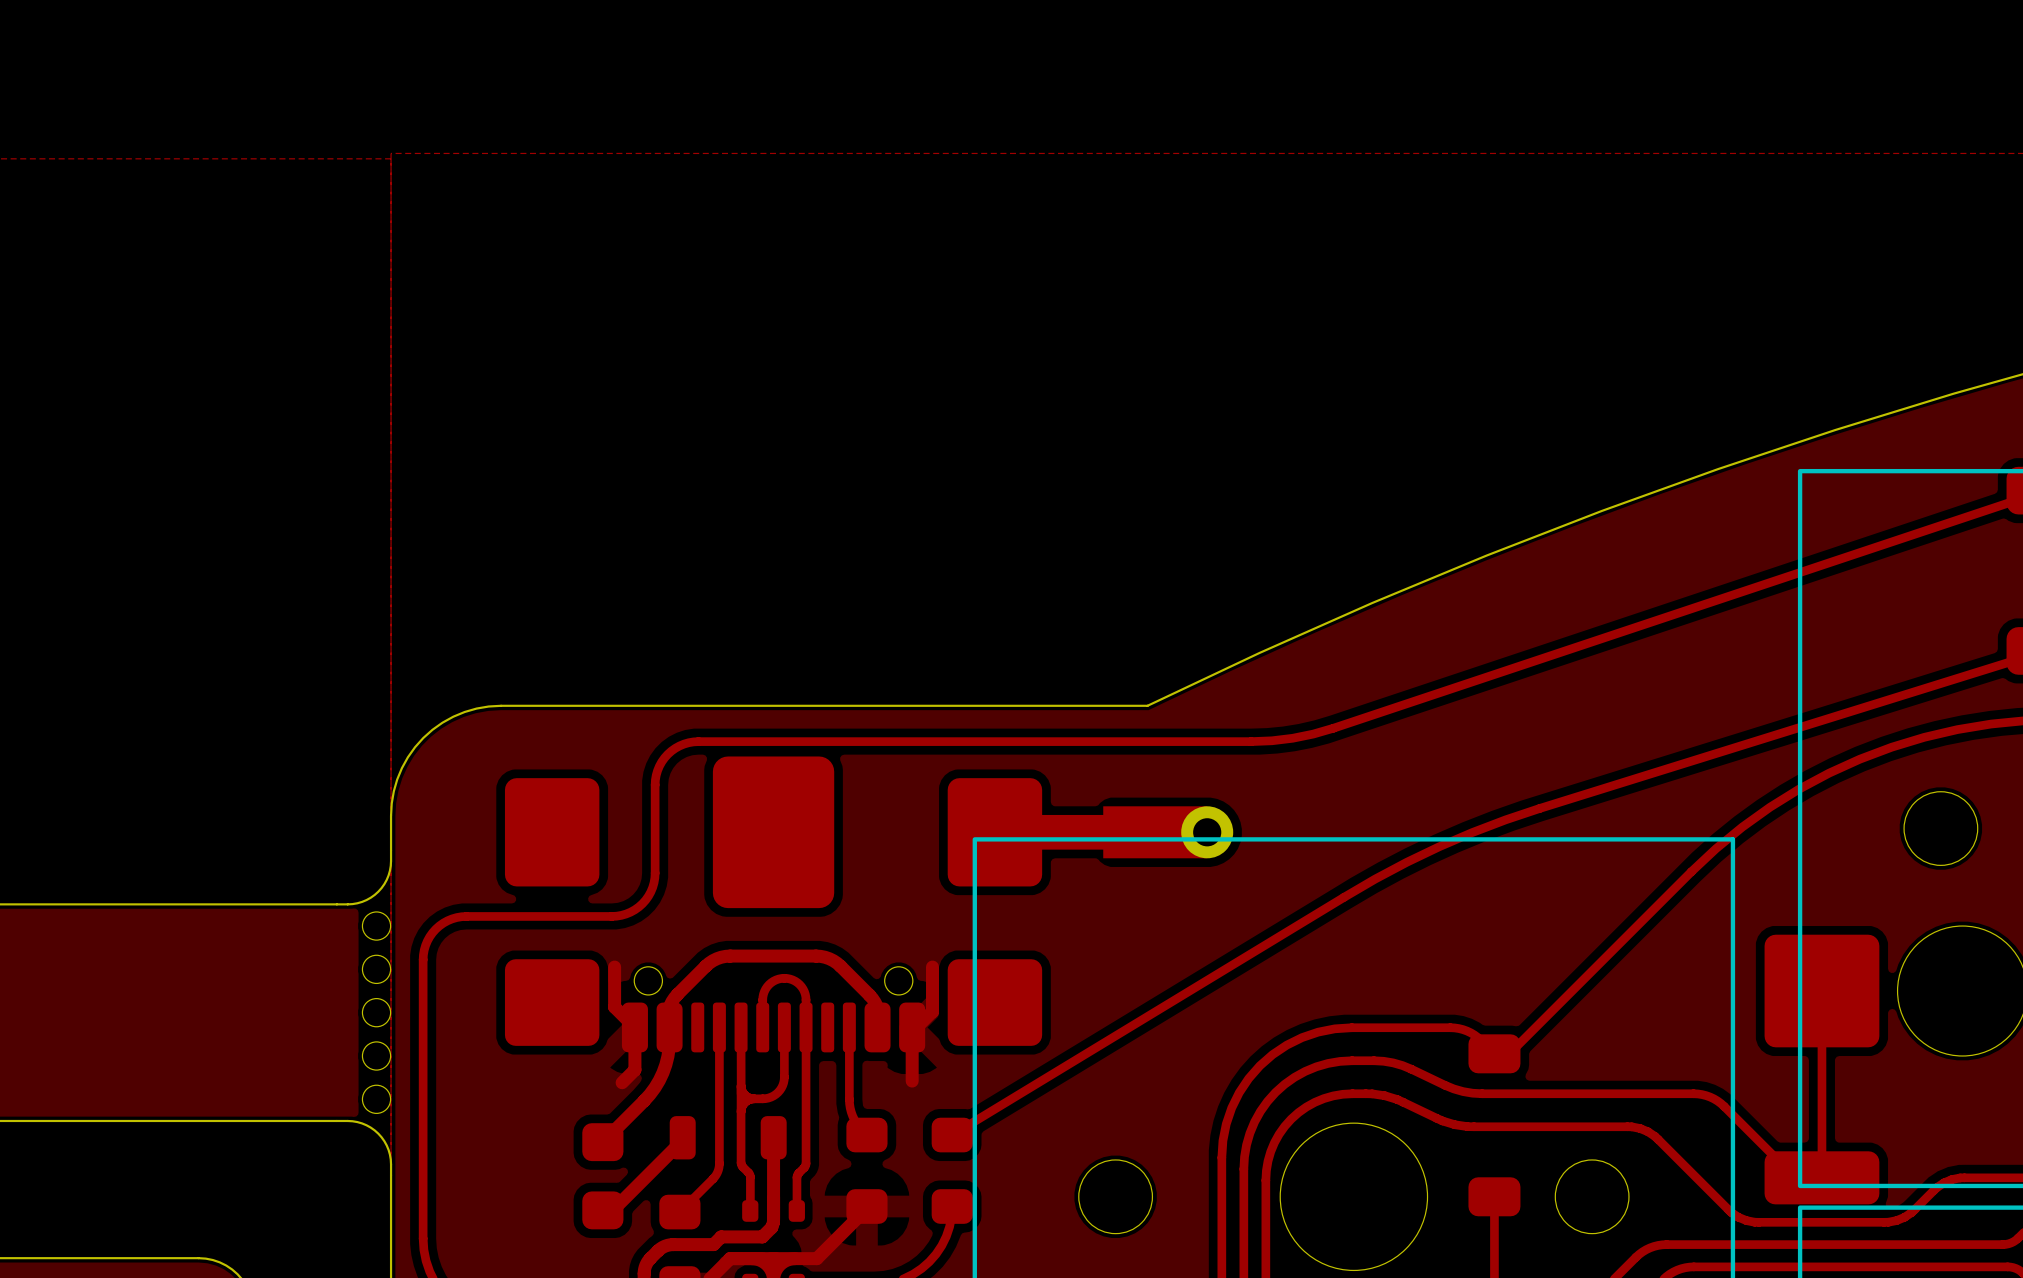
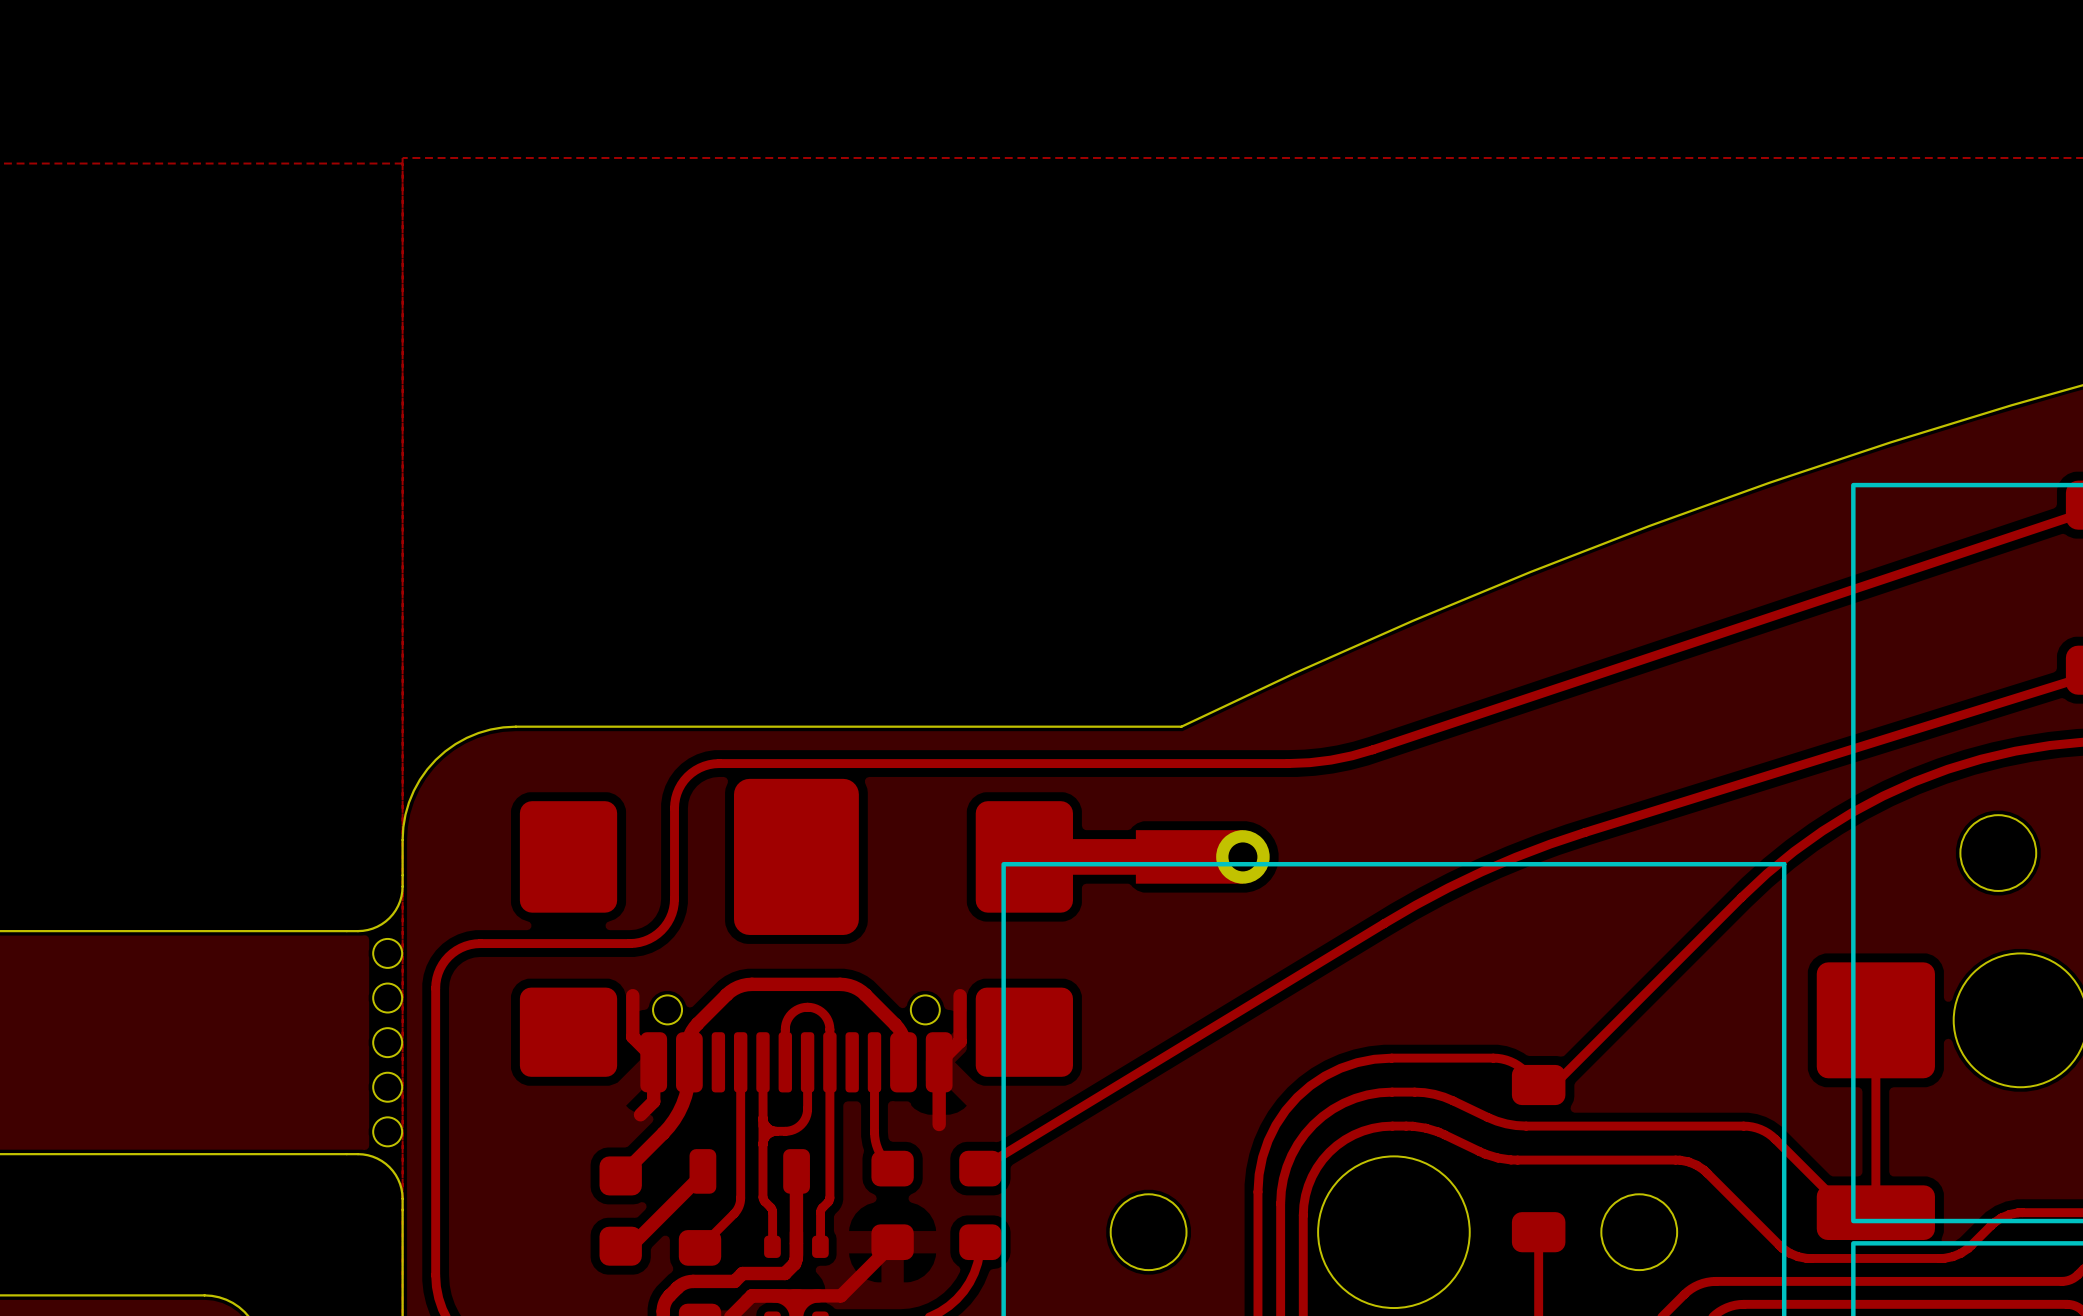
part footprint: [504, 756, 1043, 1053] -> [519, 778, 1073, 1093]
top track: none -> (939, 1113) (939, 1124)

